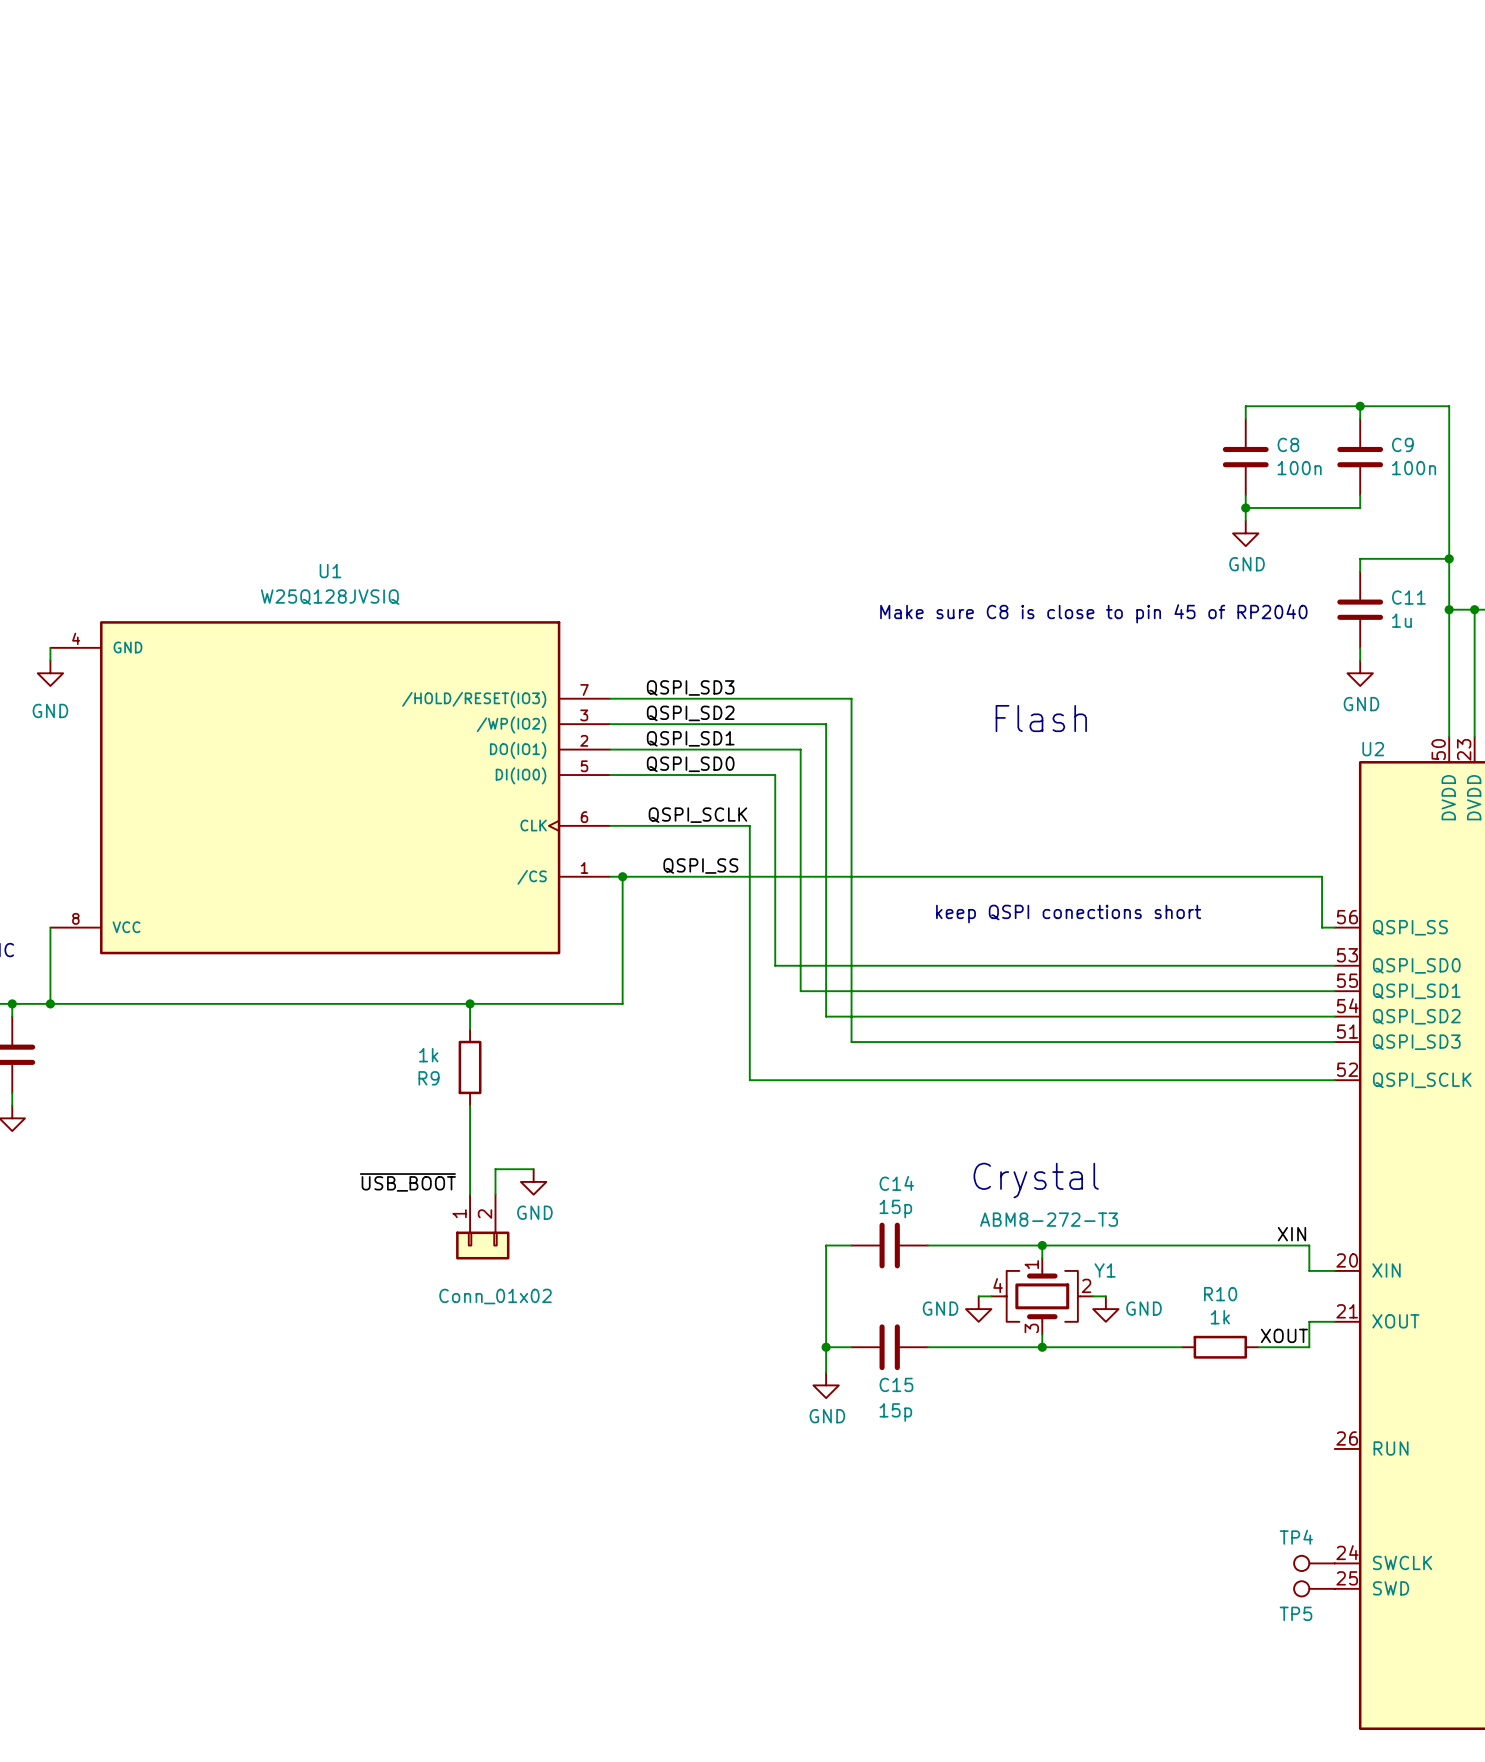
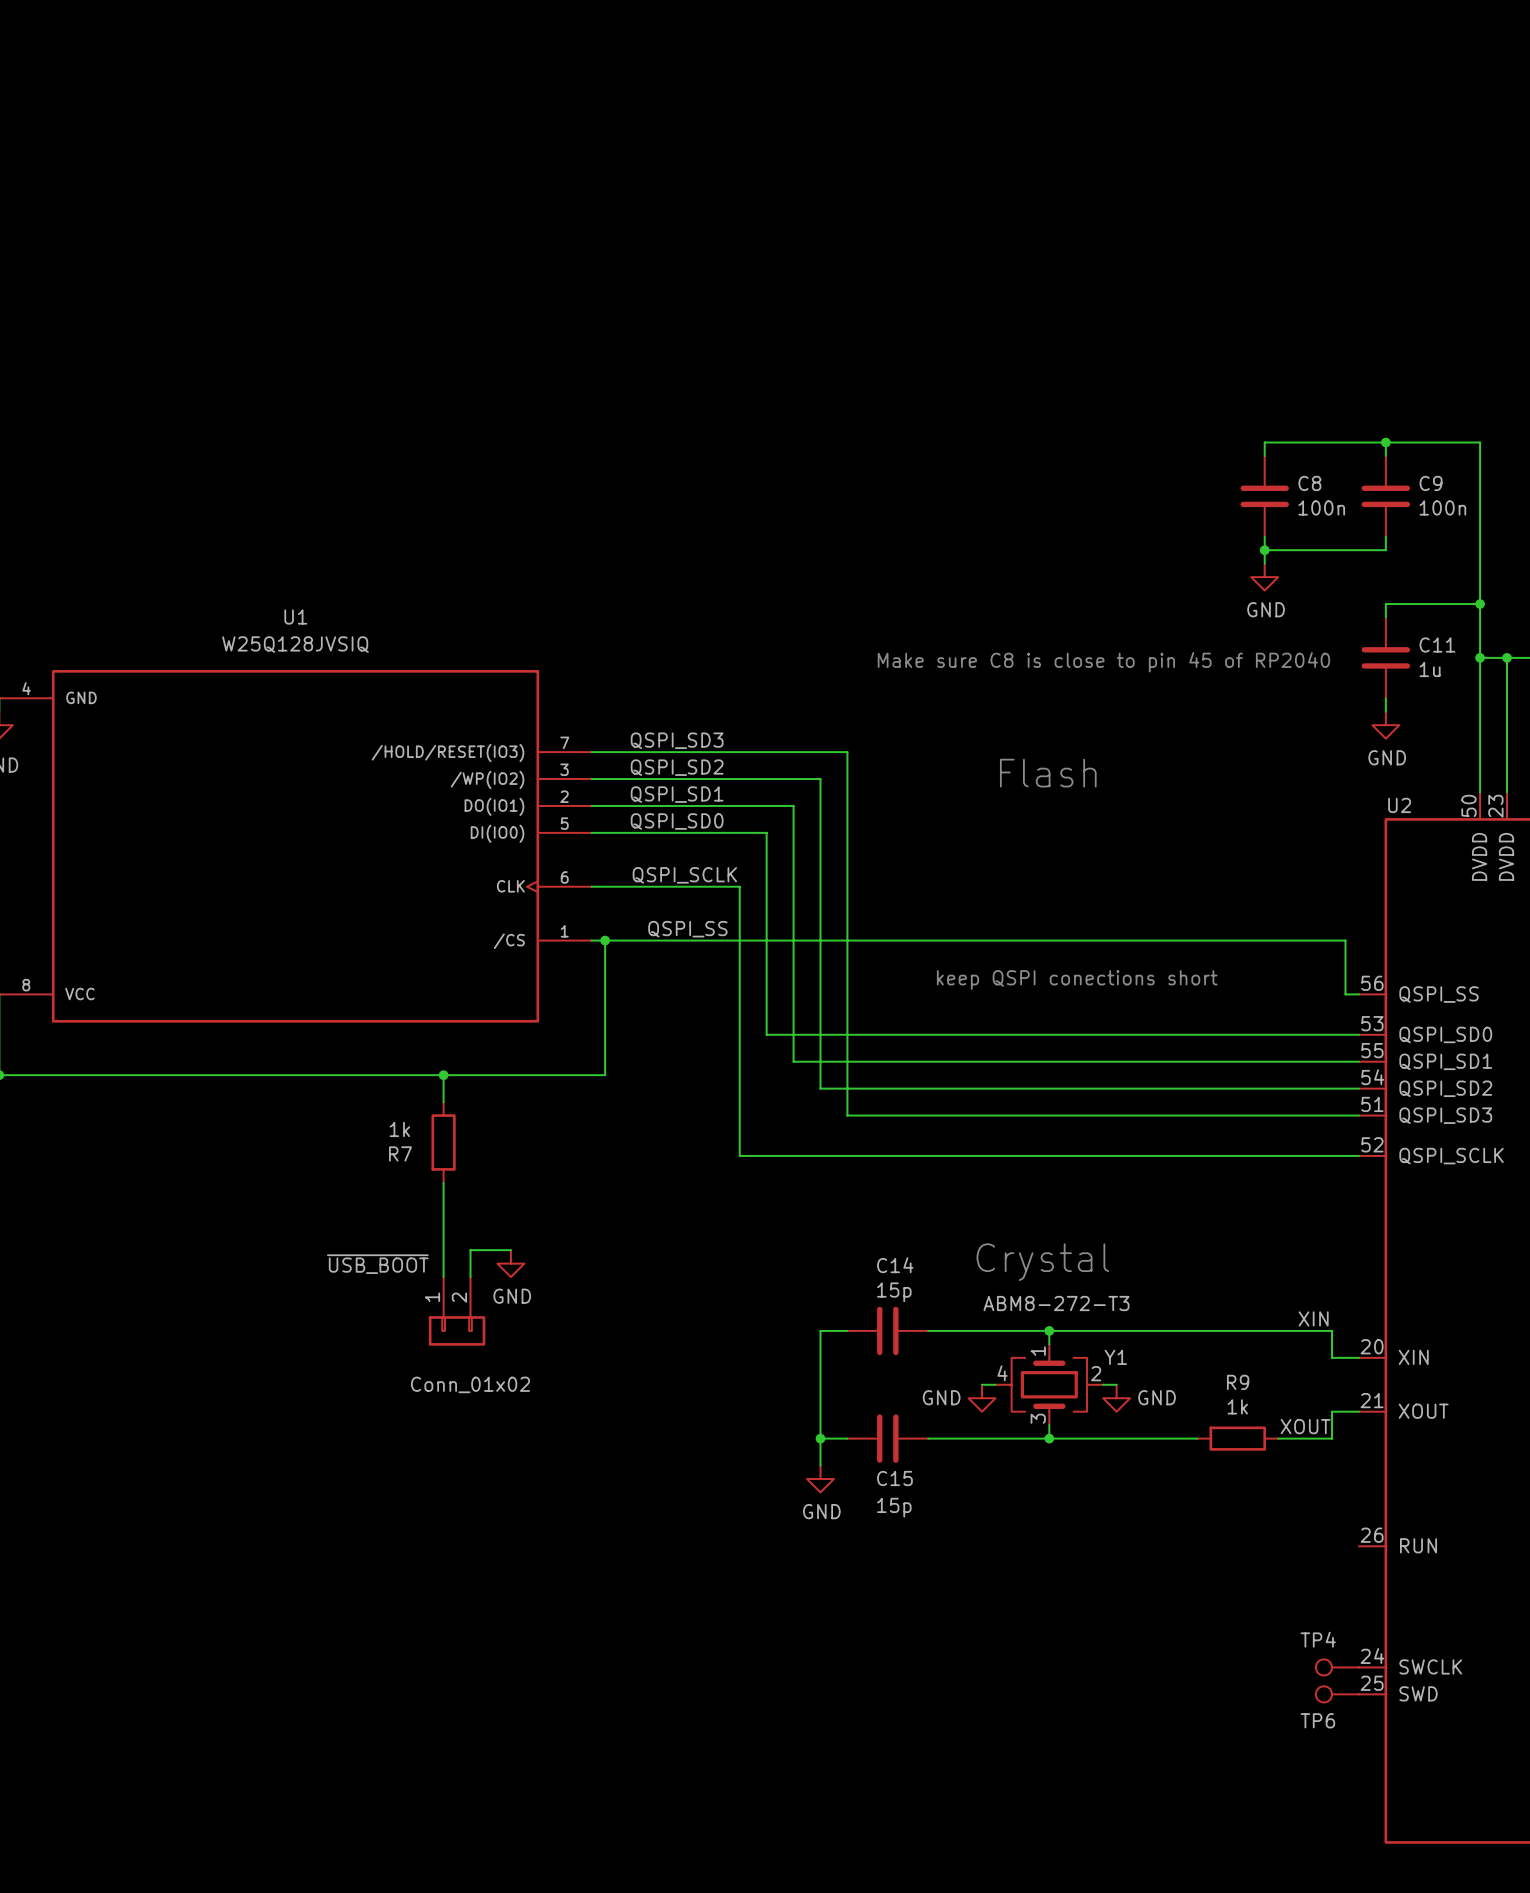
R9 name: R9 (429, 1078) -> R7 (400, 1153)
R10 name: R10 (1220, 1294) -> R9 (1238, 1382)
TP5 name: TP5 (1296, 1613) -> TP6 (1317, 1720)

